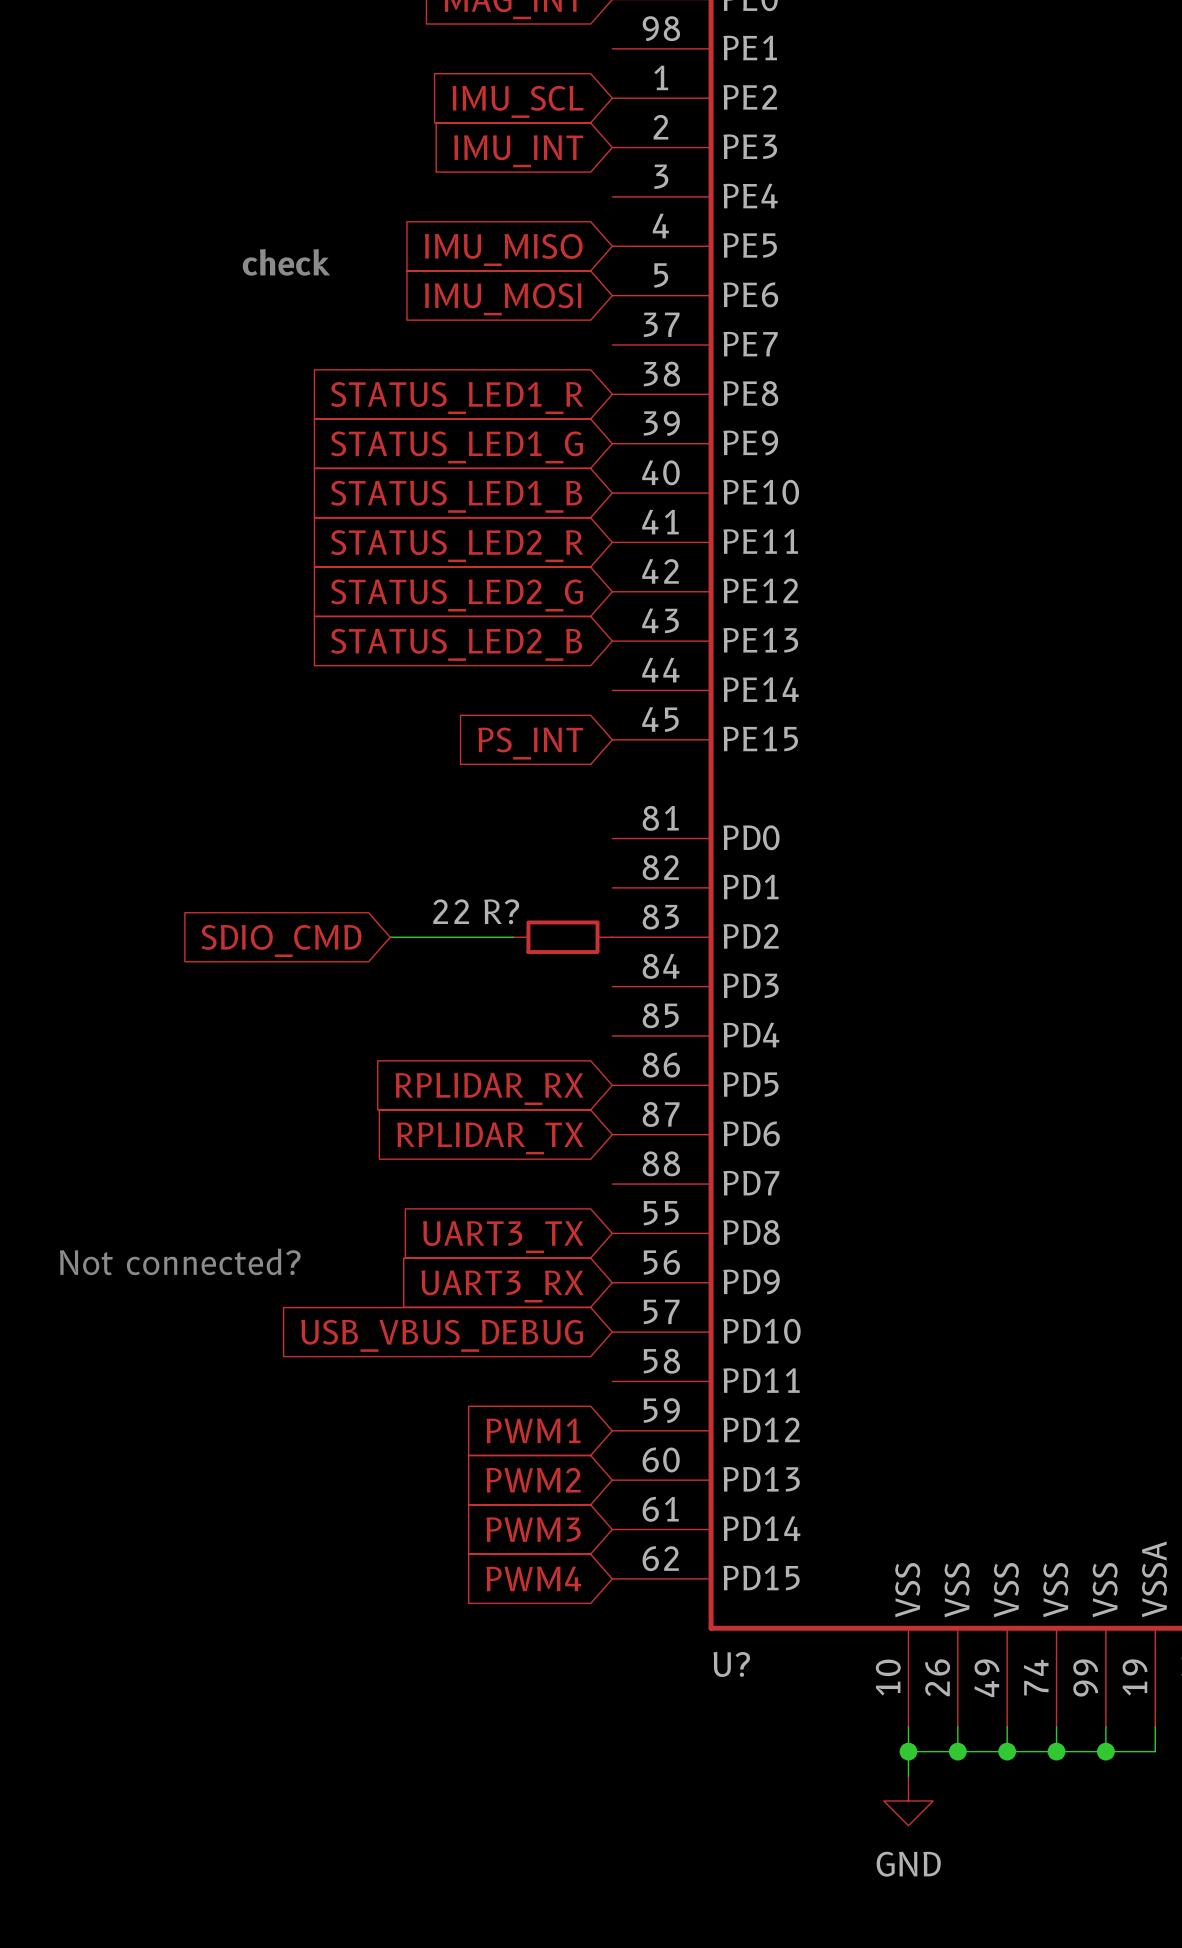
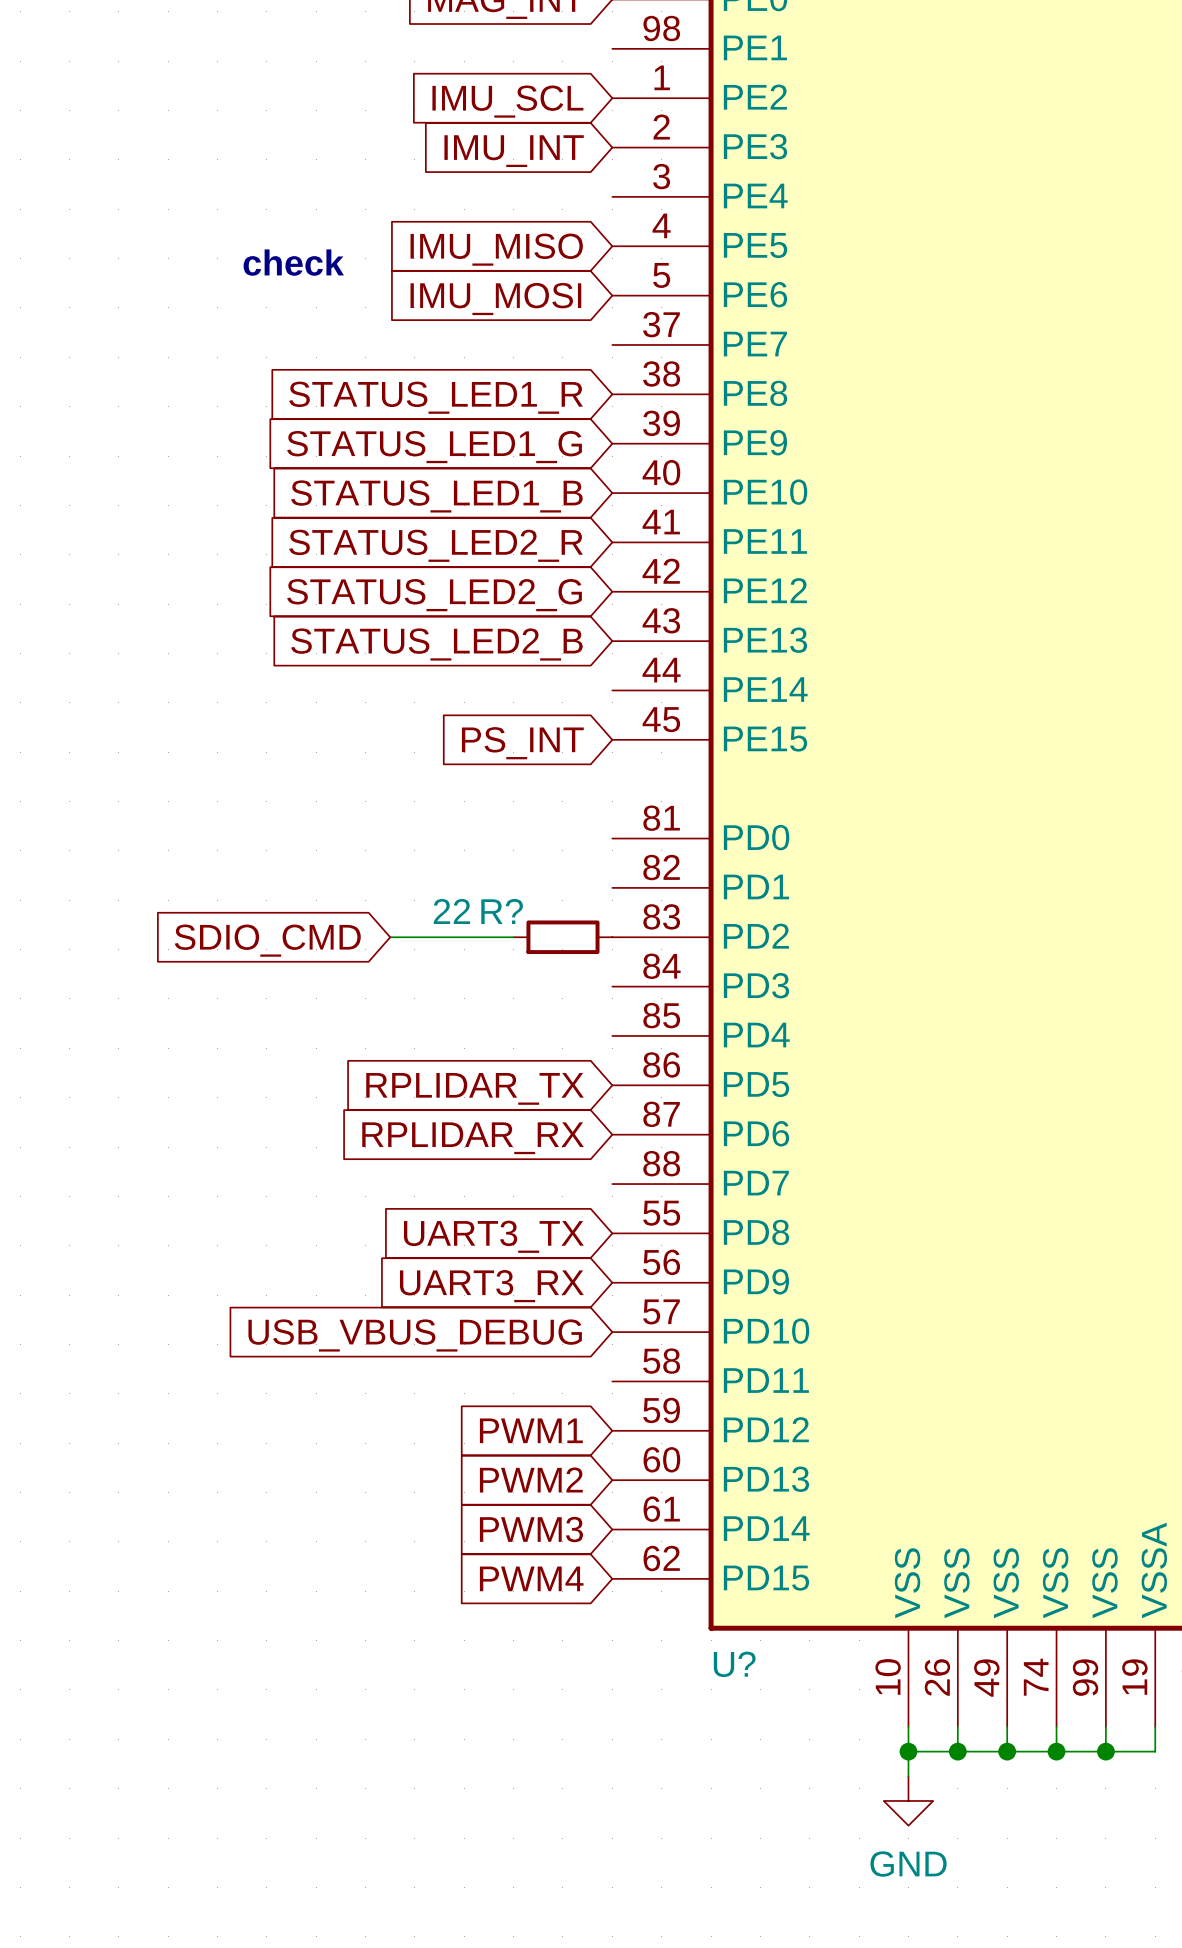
global label: RPLIDAR_RX (489, 1089) -> RPLIDAR_TX (475, 1088)
global label: RPLIDAR_TX (490, 1138) -> RPLIDAR_RX (473, 1138)
text: Not connected? (180, 1261) -> none

